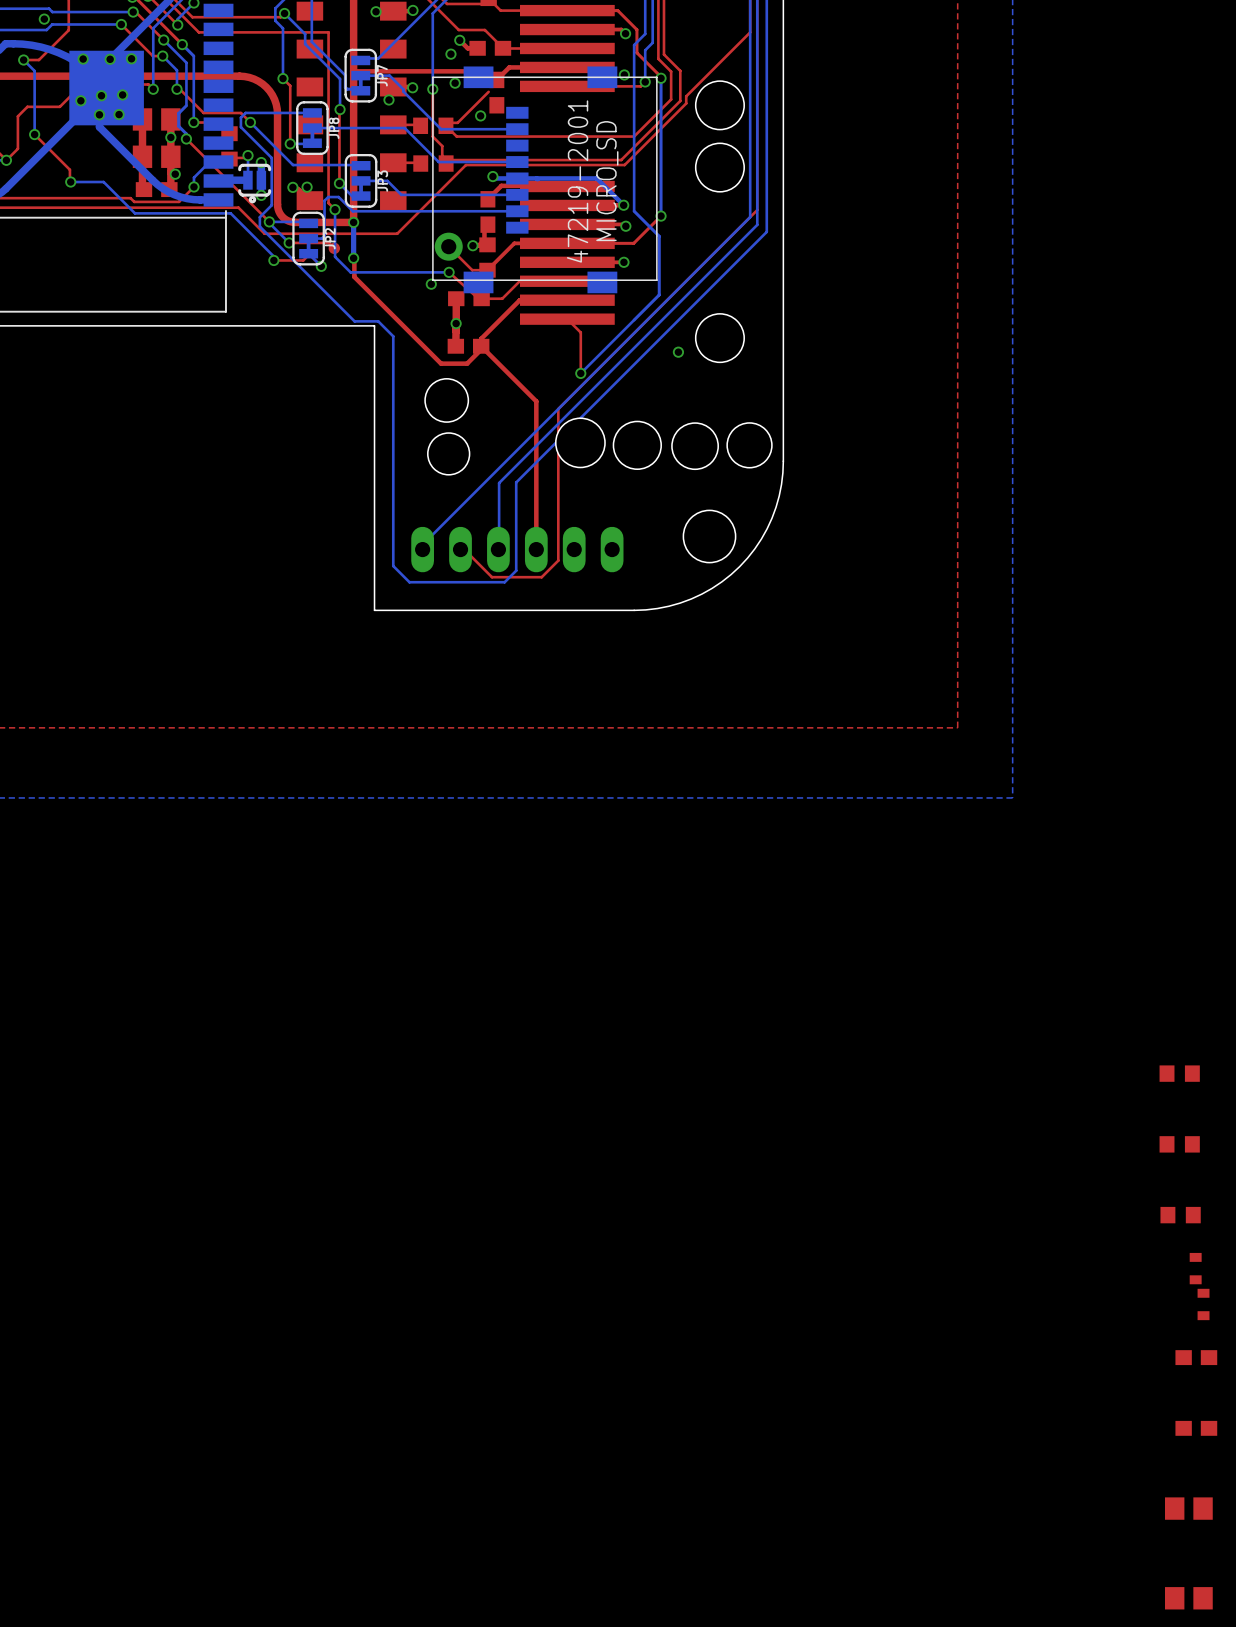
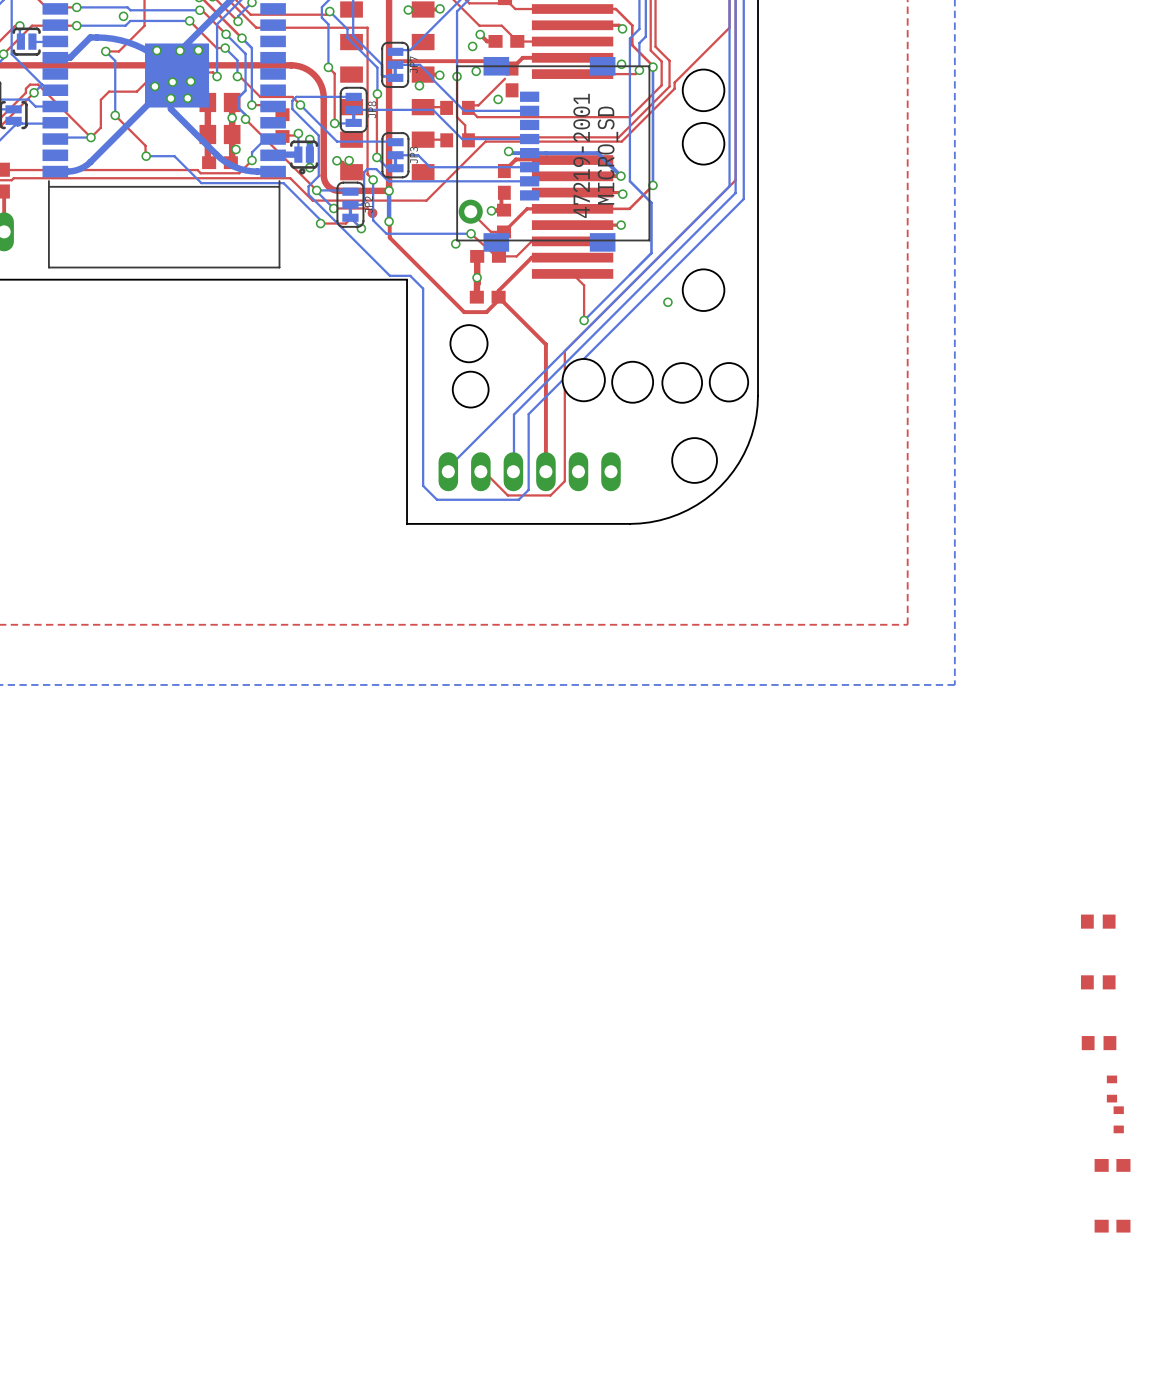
part: (1188, 1508) -> none
part: (1188, 1598) -> none

